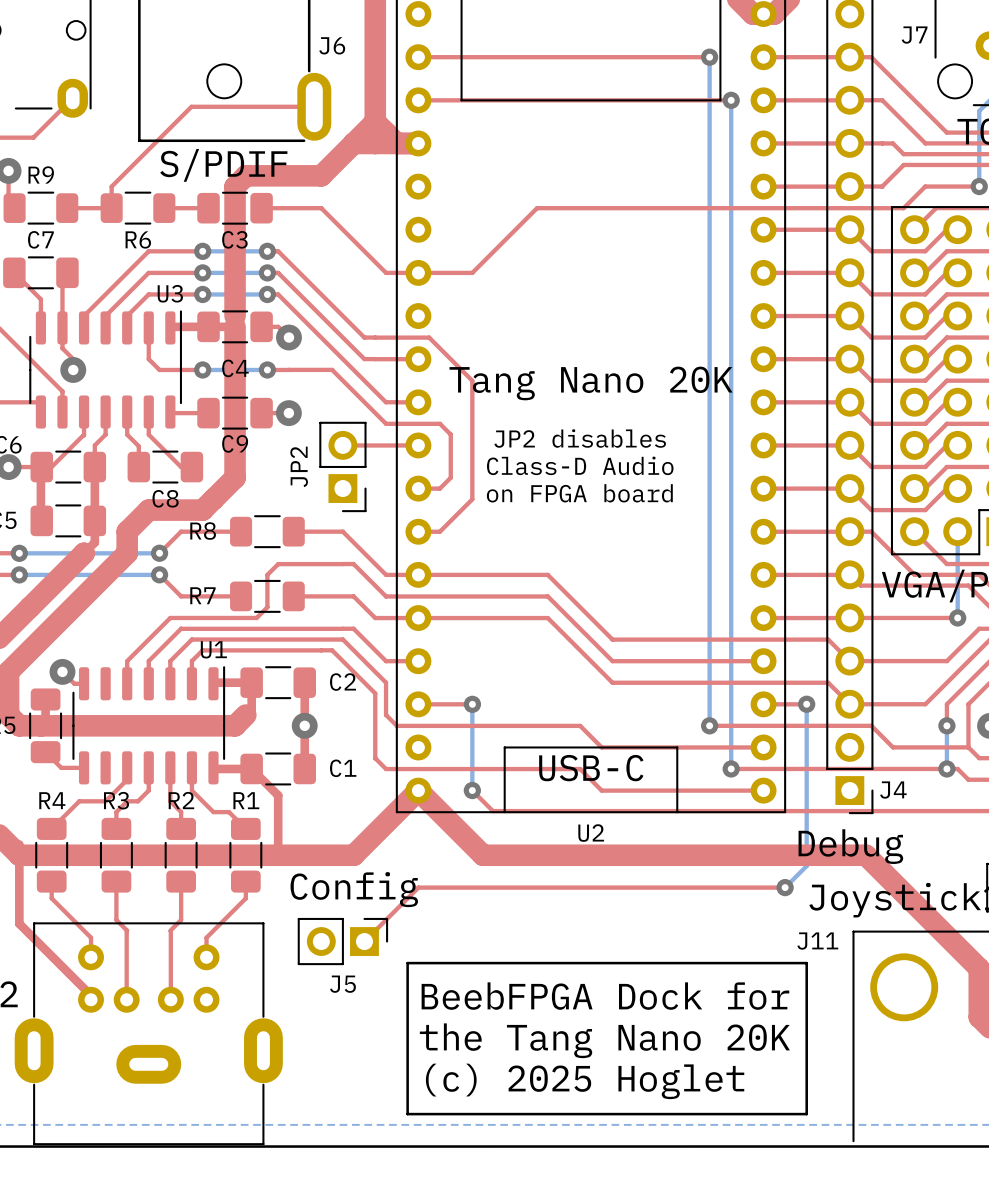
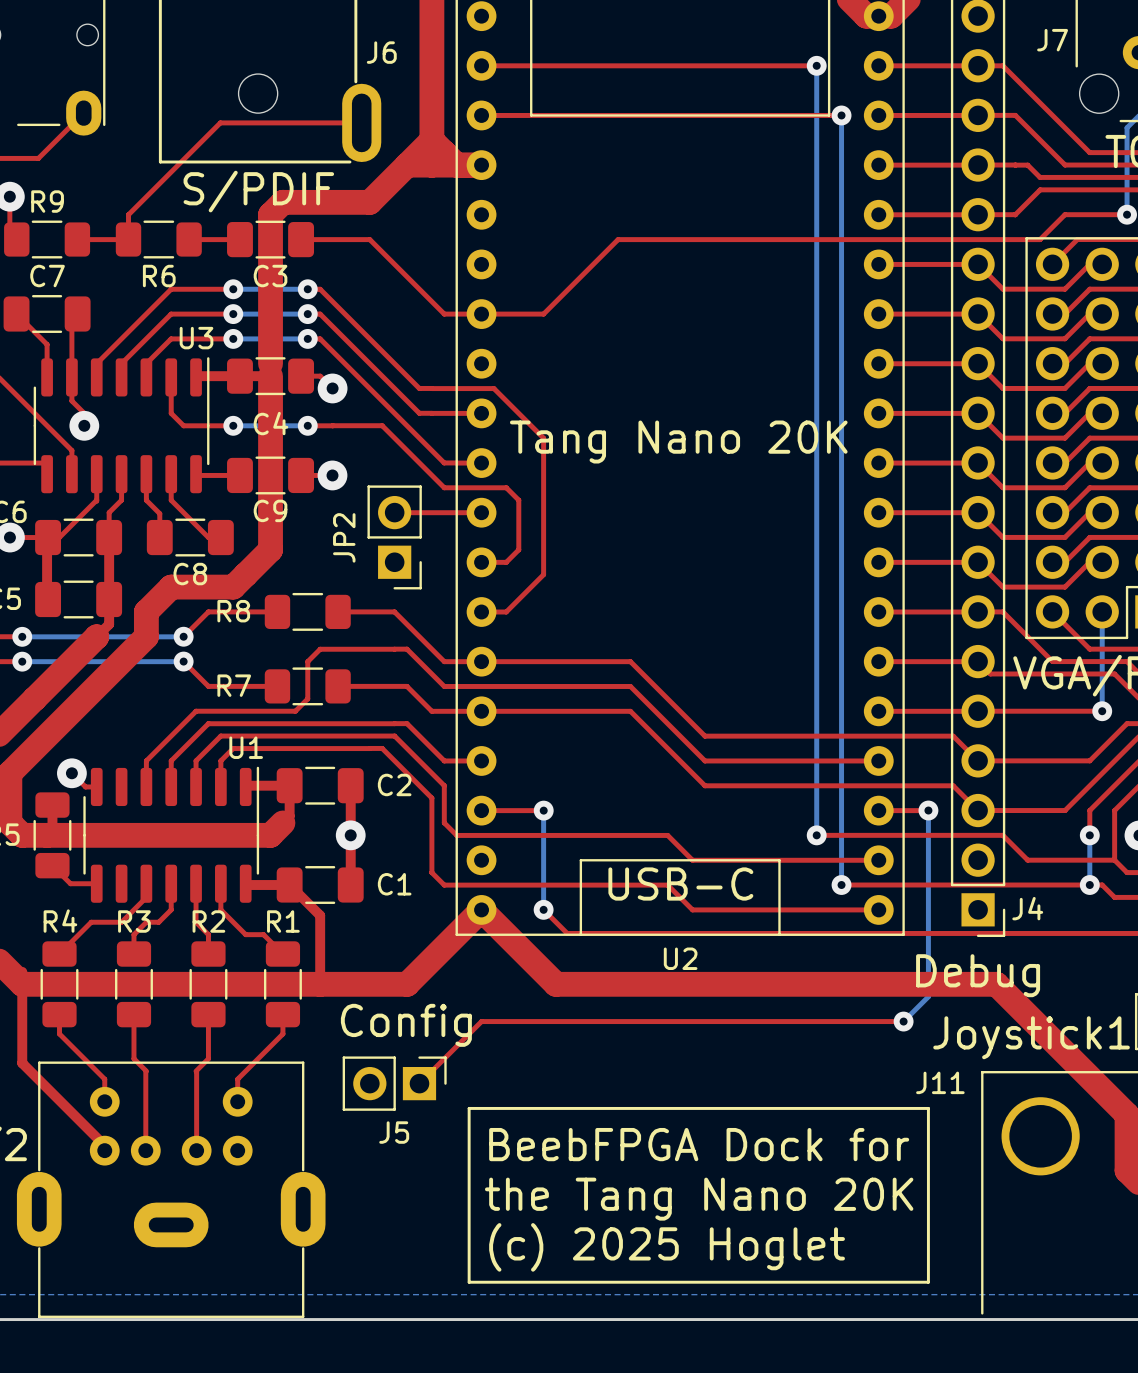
text: JP2 disables (580, 438) -> none
text: Class-D Audio (580, 465) -> none
text: on FPGA board (579, 493) -> none
U2 text: none -> BeebFPGA Dock for (699, 1144)
text: BeebFPGA Dock for (605, 996) -> none
text: (c) 2025 Hoglet (585, 1081) -> none
U2 text: none -> (c) 2025 Hoglet (667, 1247)

